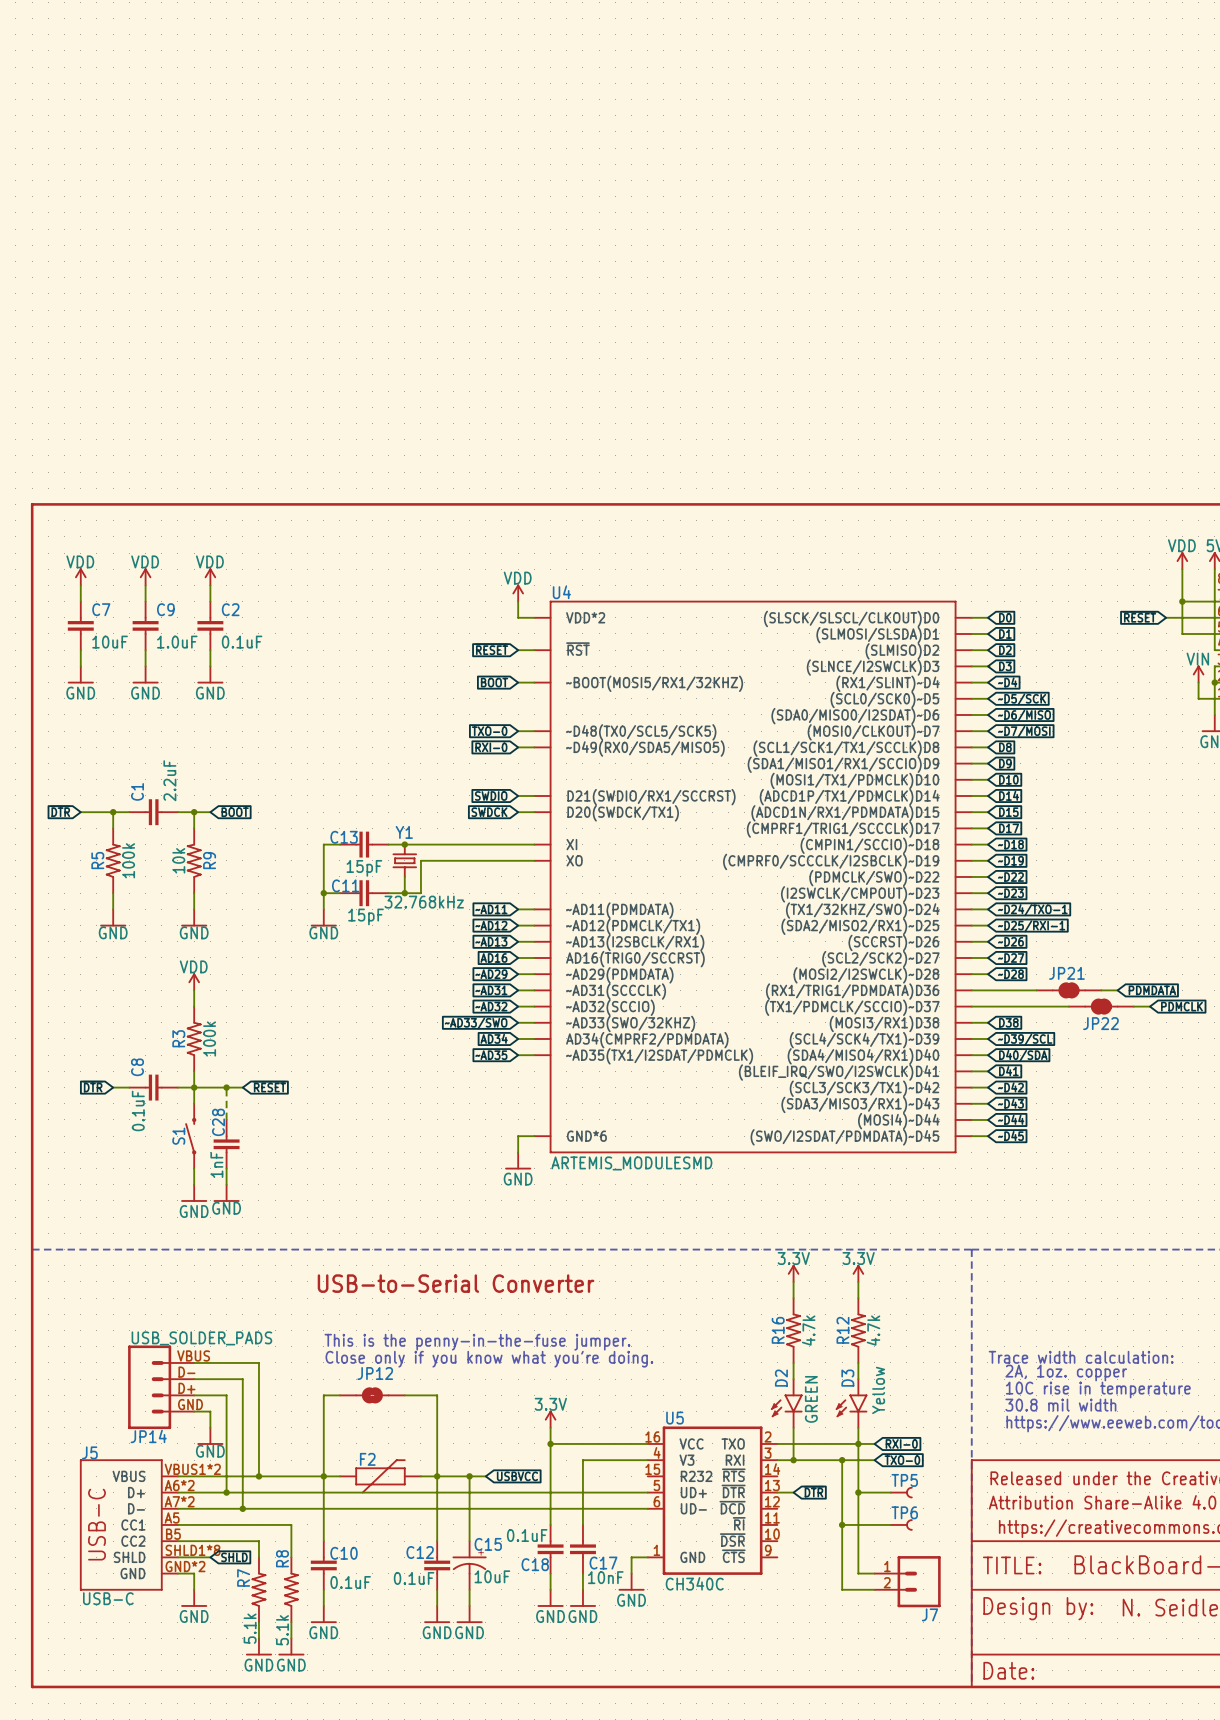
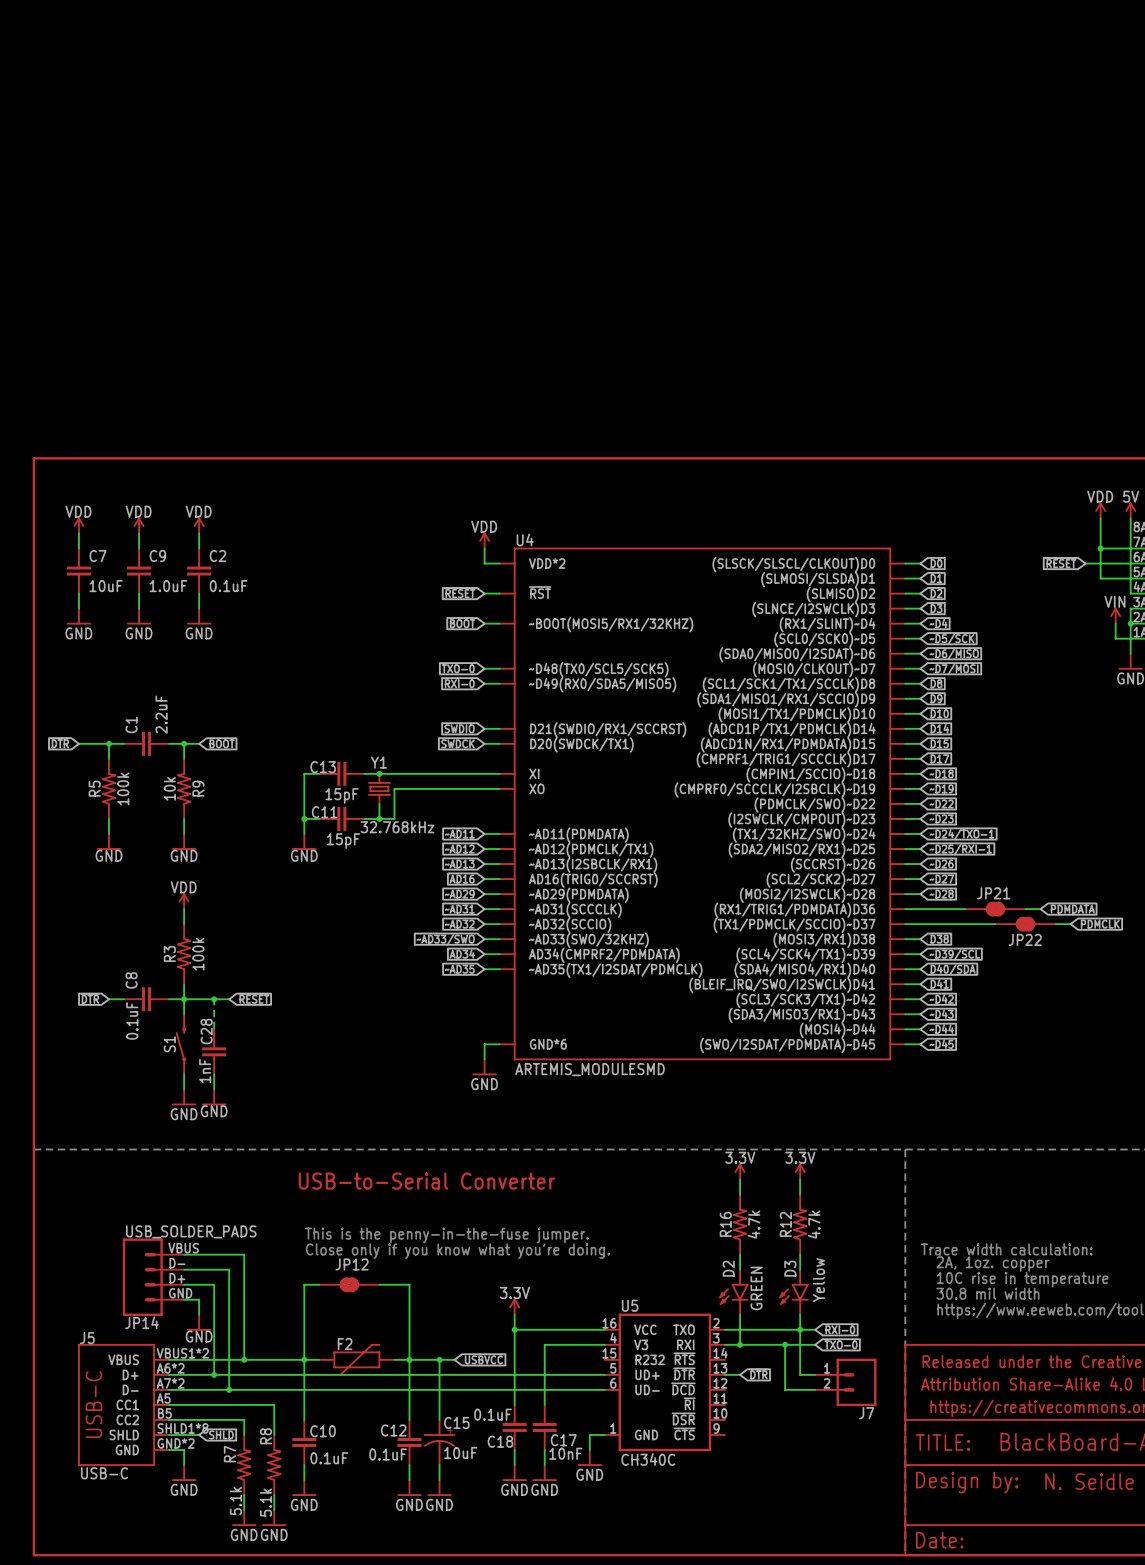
wire: (858, 1492) (858, 1573) (874, 1573) -> none
junction: (858, 1492) -> none
TP5: (901, 1492) -> none
wire: (842, 1508) (842, 1589) (874, 1589) -> (785, 1389) (815, 1389)
wire: (842, 1524) (890, 1524) -> none
junction: (842, 1524) -> none
TP6: (901, 1524) -> none
J7 position: (907, 1581) -> (845, 1382)

